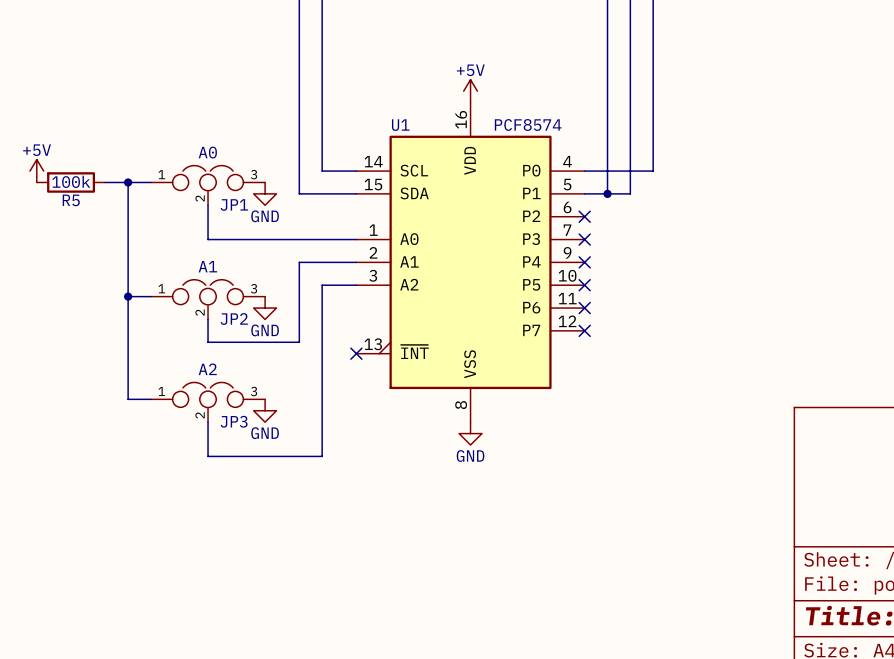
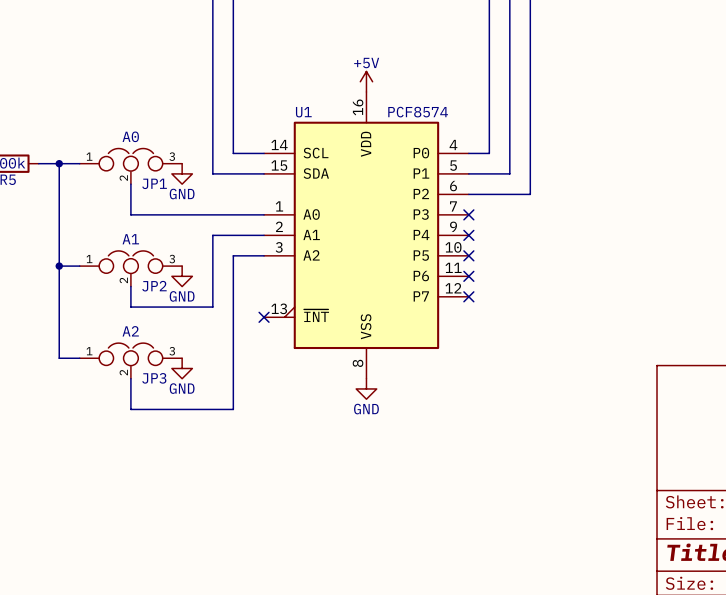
wire: (653, 171) (607, 171) (607, 193) -> (530, 153) (530, 194) (468, 194)
junction: (607, 193) -> none
no-connect mark: (584, 216) -> none

